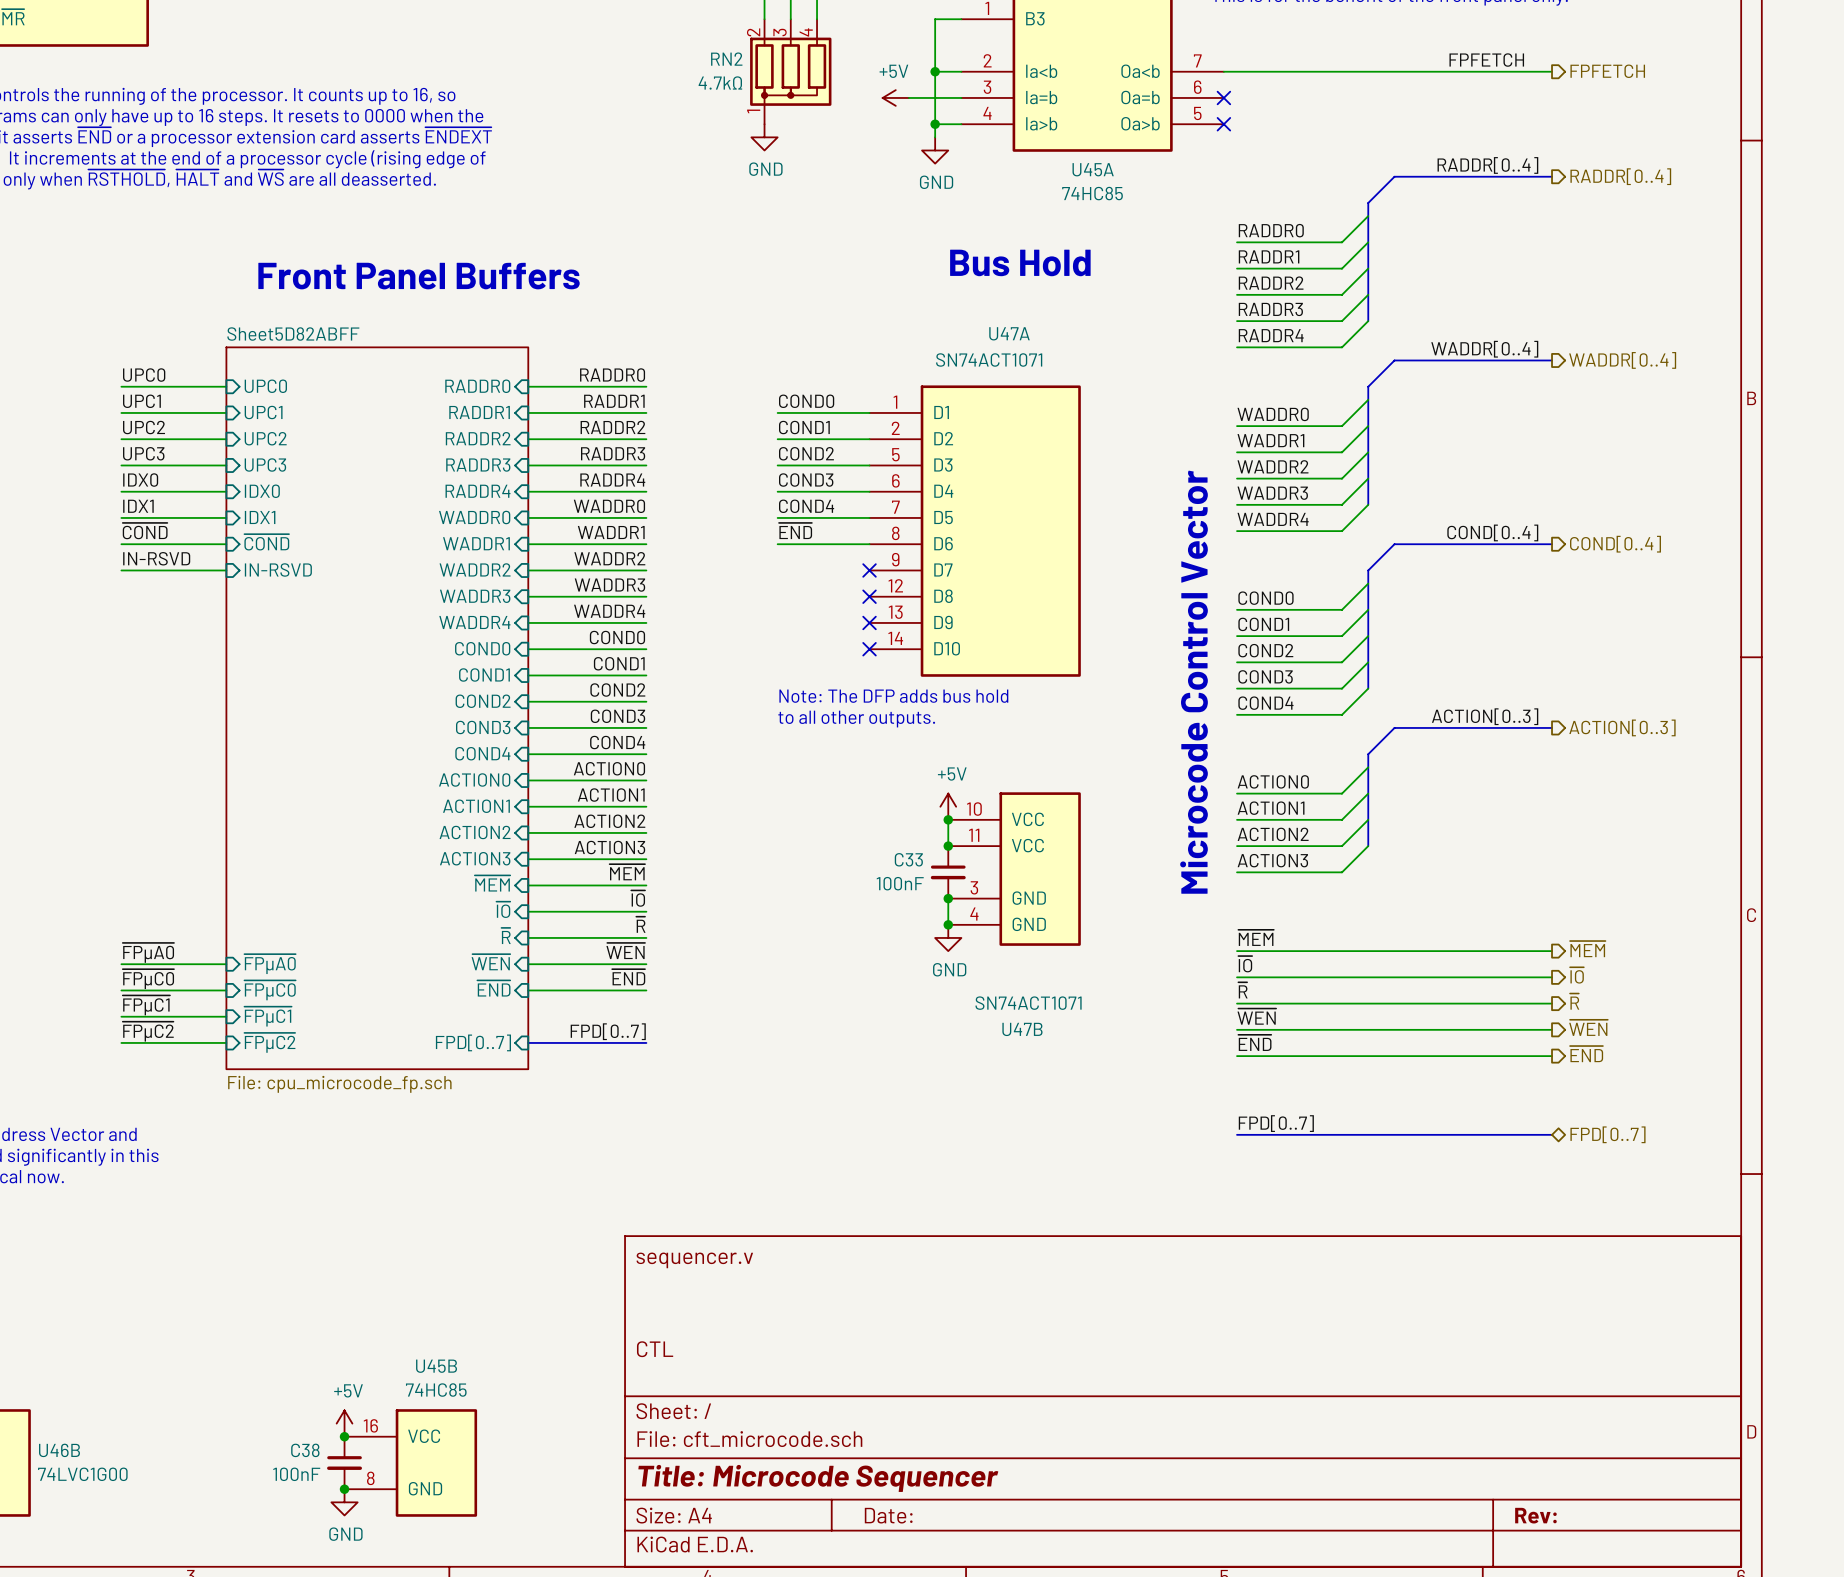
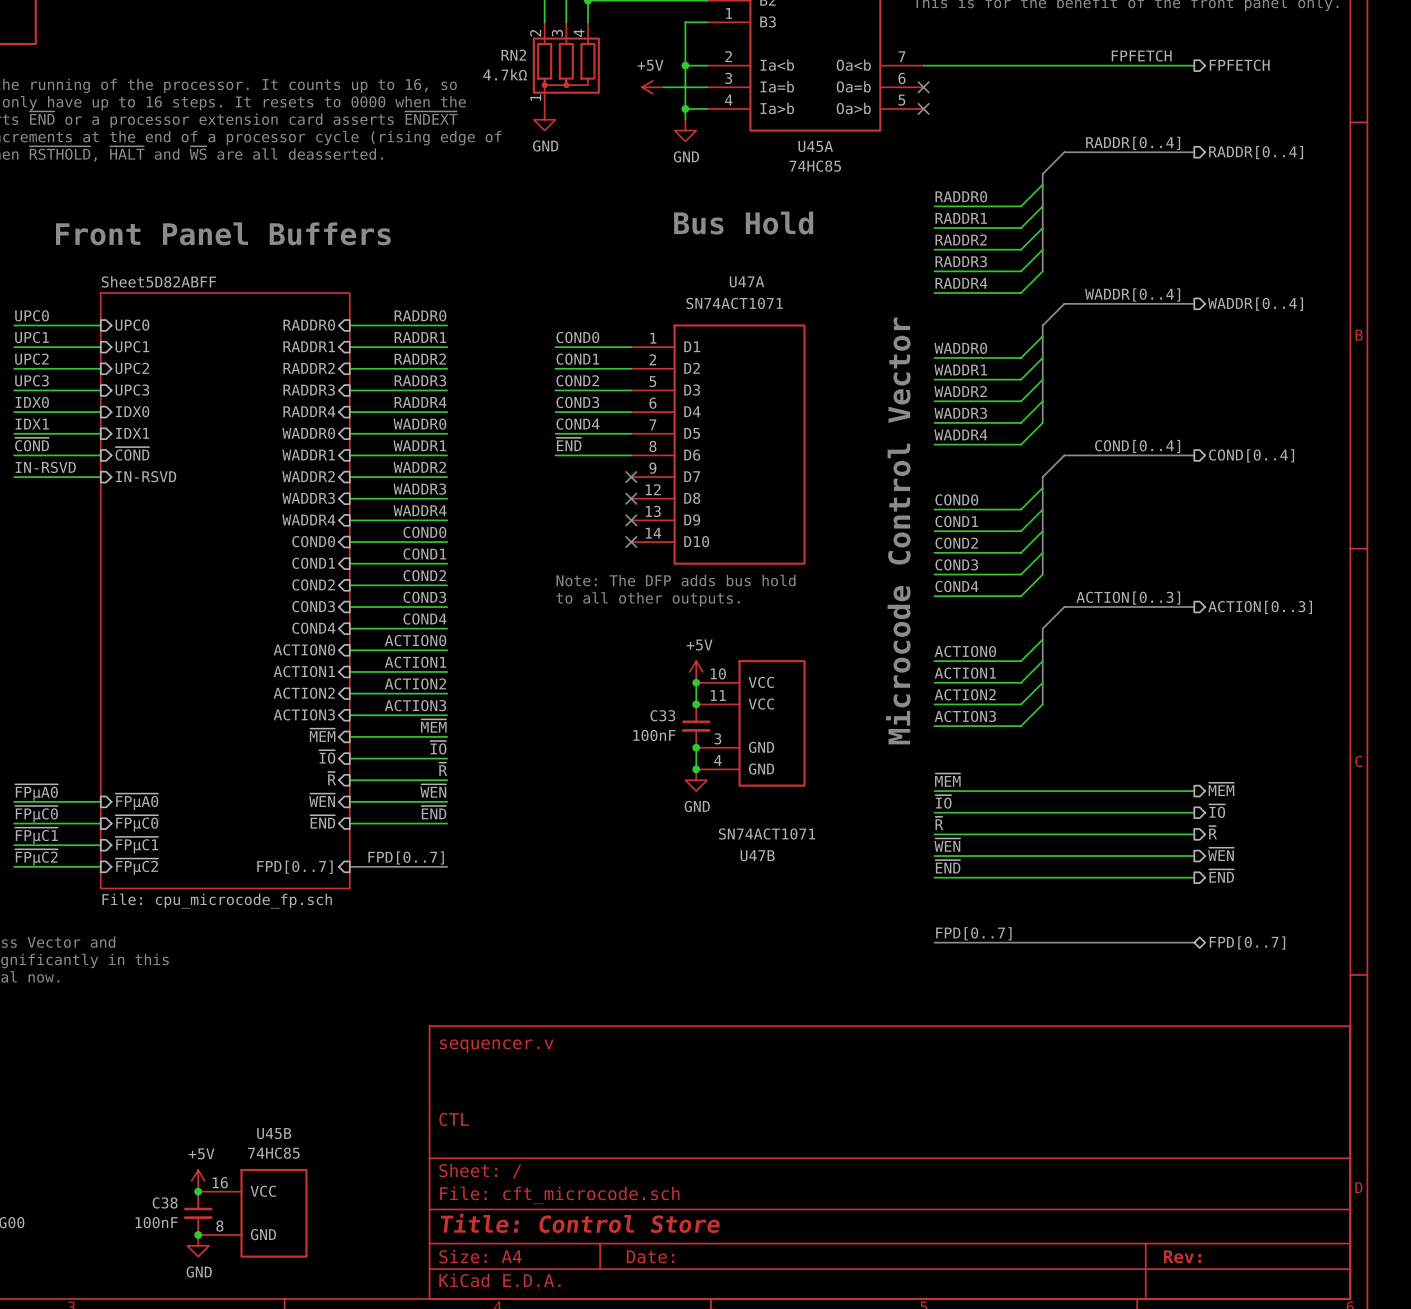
title block: Title: Microcode Sequencer (818, 1478) -> Title: Control Store (580, 1223)

